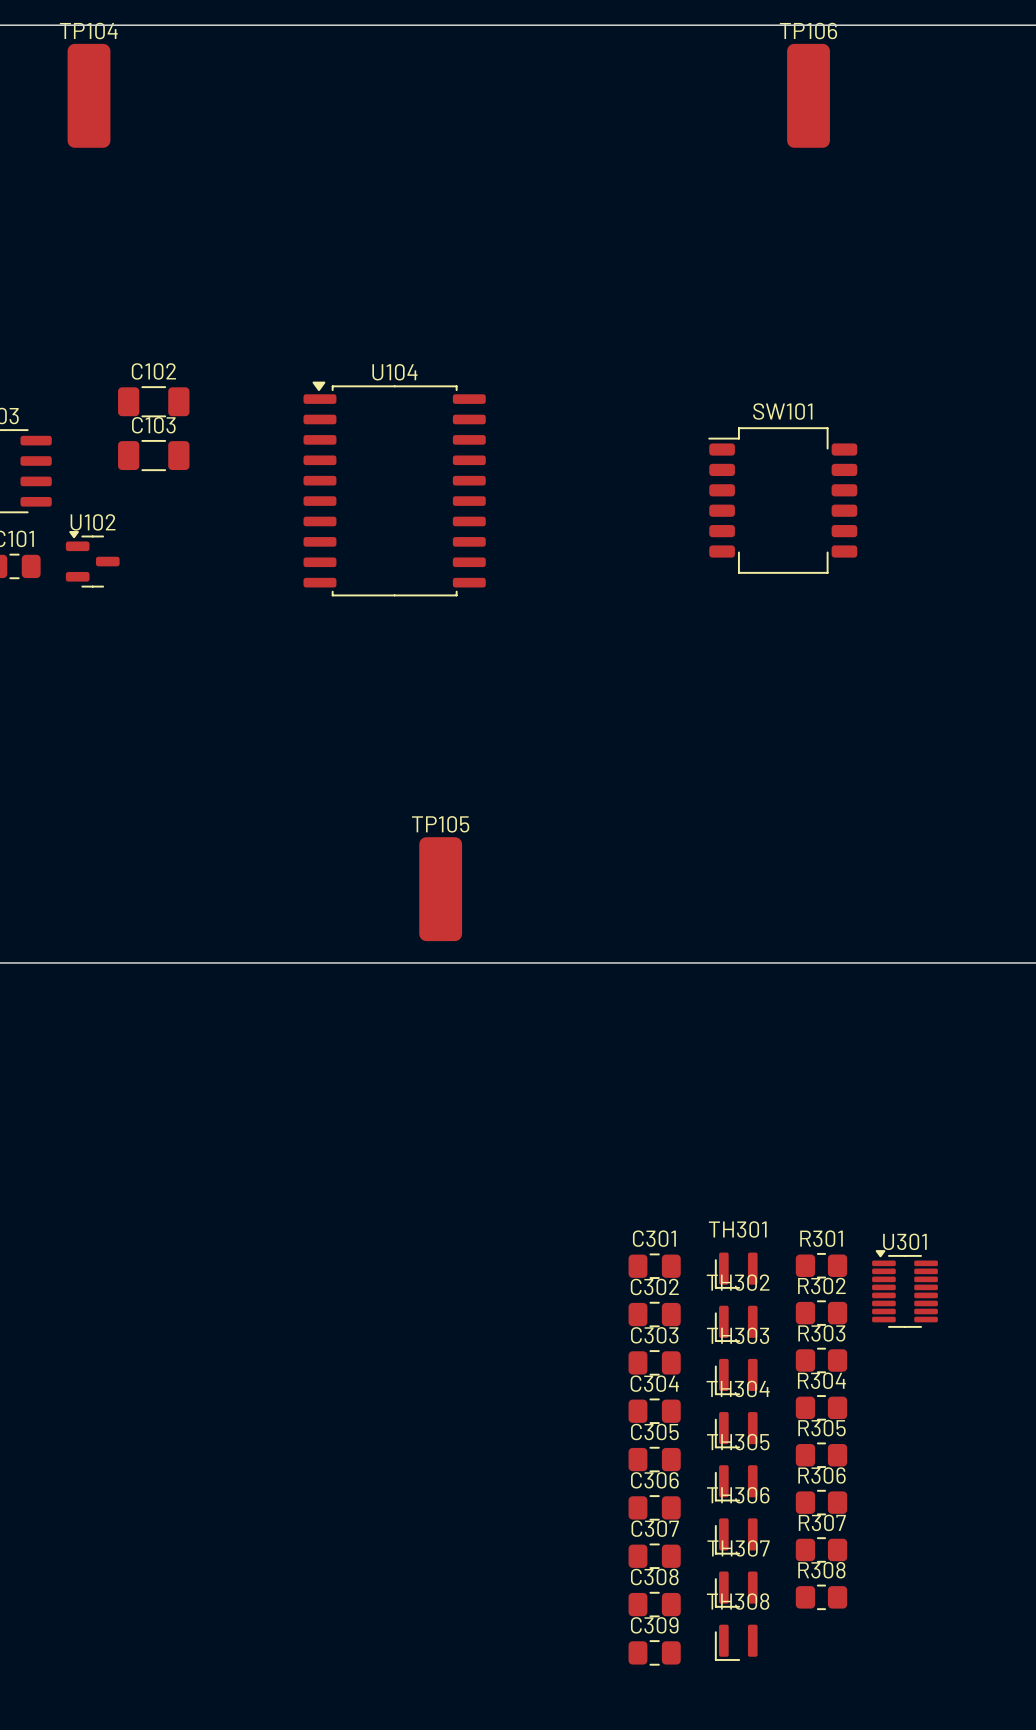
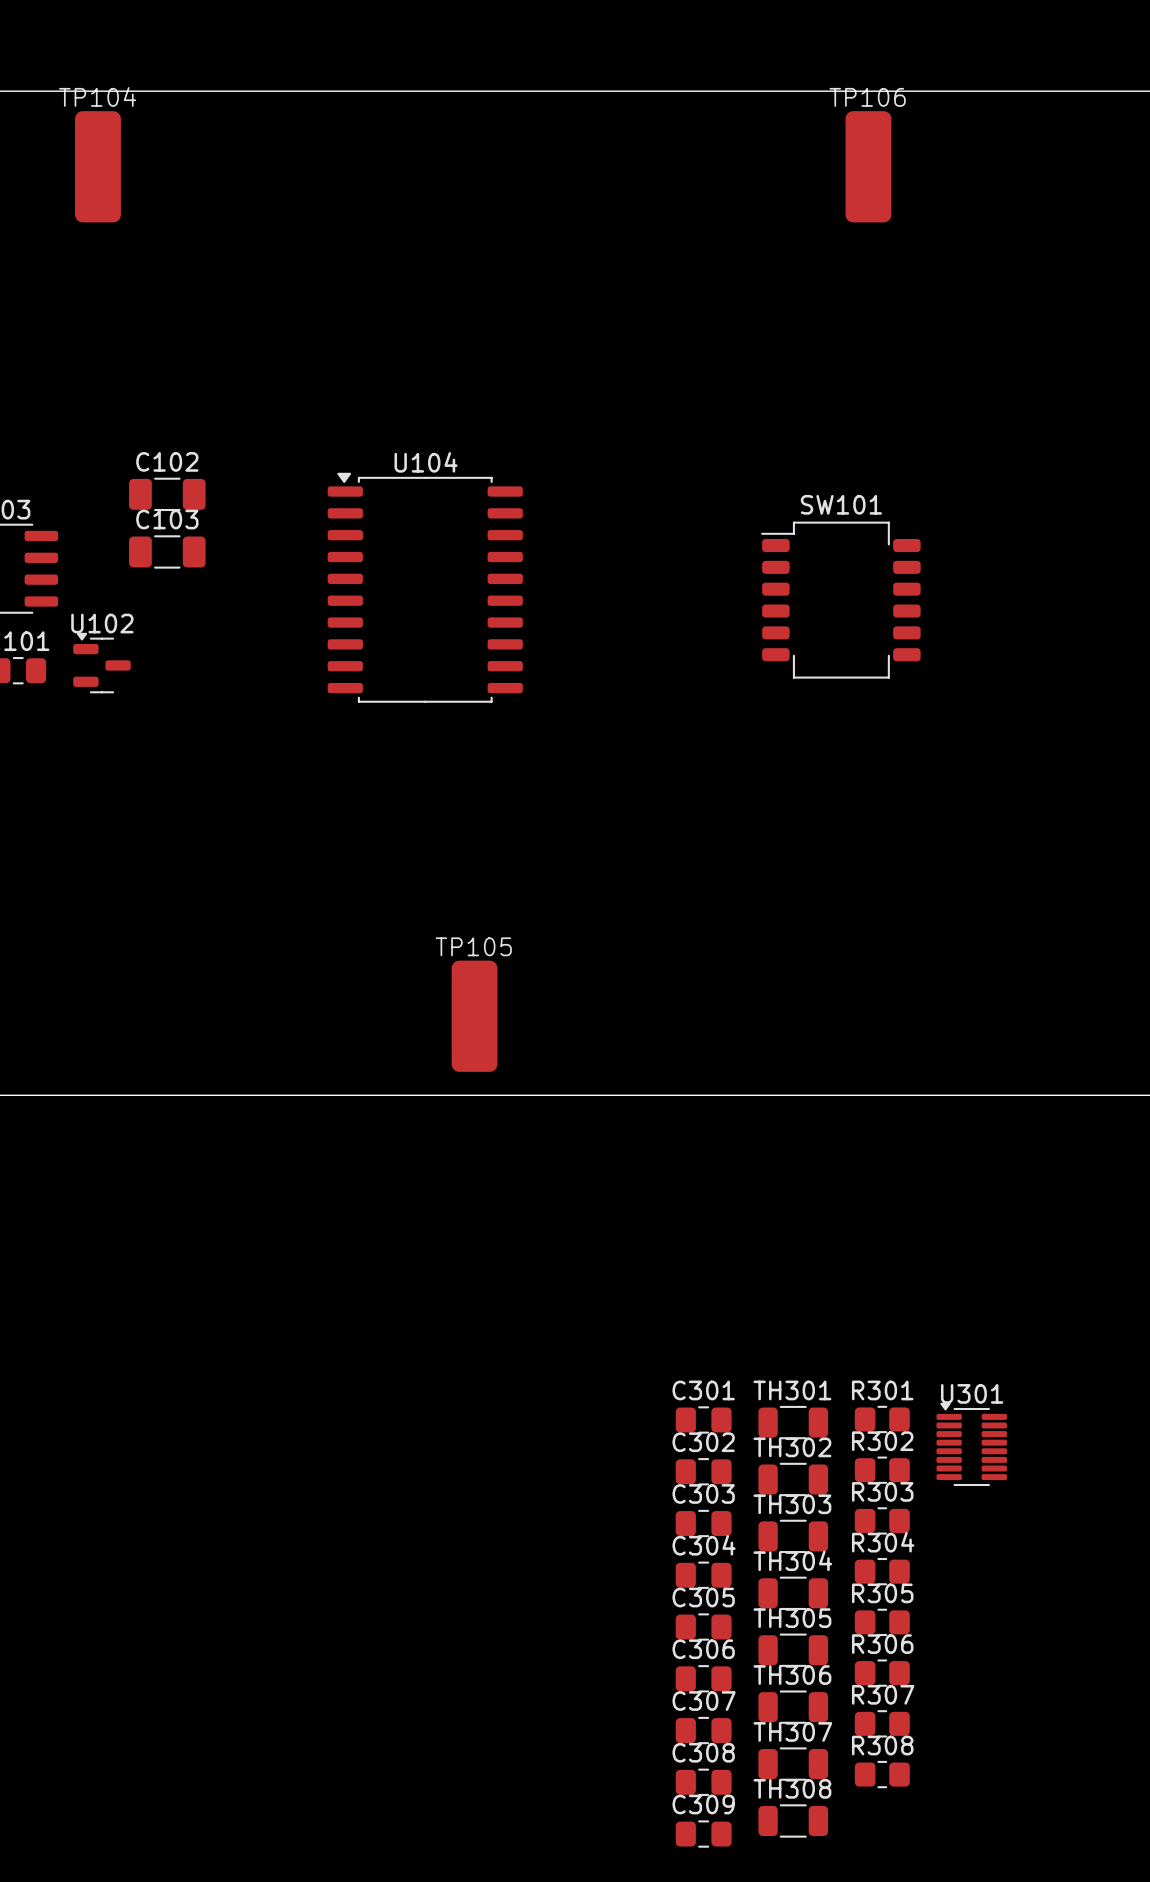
TH301 footprint: [714, 1252, 758, 1289] -> [758, 1405, 829, 1440]
TH302 footprint: [714, 1305, 758, 1343] -> [758, 1462, 829, 1497]
TH303 footprint: [714, 1358, 758, 1396] -> [758, 1519, 829, 1554]
TH304 footprint: [714, 1412, 758, 1449] -> [758, 1576, 829, 1610]
TH305 footprint: [714, 1465, 758, 1502] -> [758, 1633, 829, 1667]
TH306 footprint: [714, 1518, 758, 1555] -> [758, 1690, 829, 1724]
TH307 footprint: [714, 1571, 758, 1608] -> [758, 1747, 829, 1781]
TH308 footprint: [714, 1624, 758, 1661] -> [758, 1804, 829, 1838]

